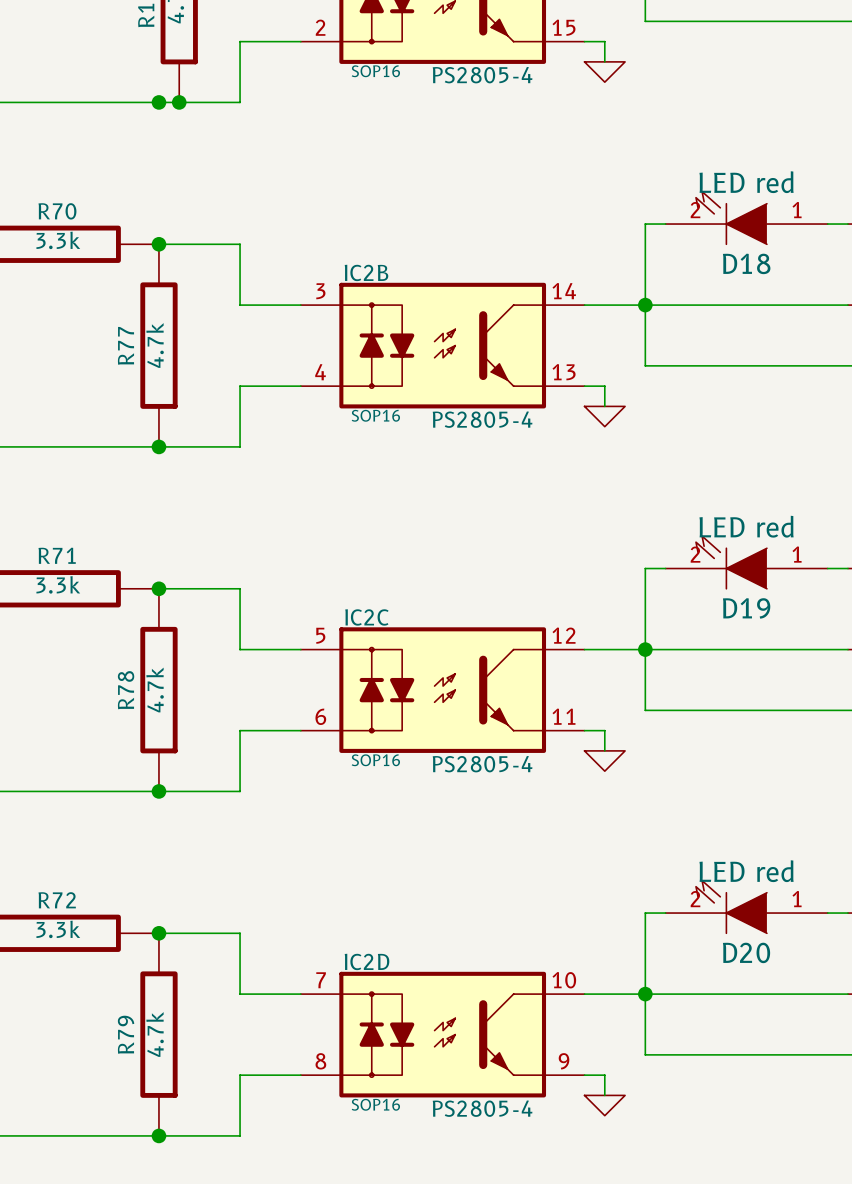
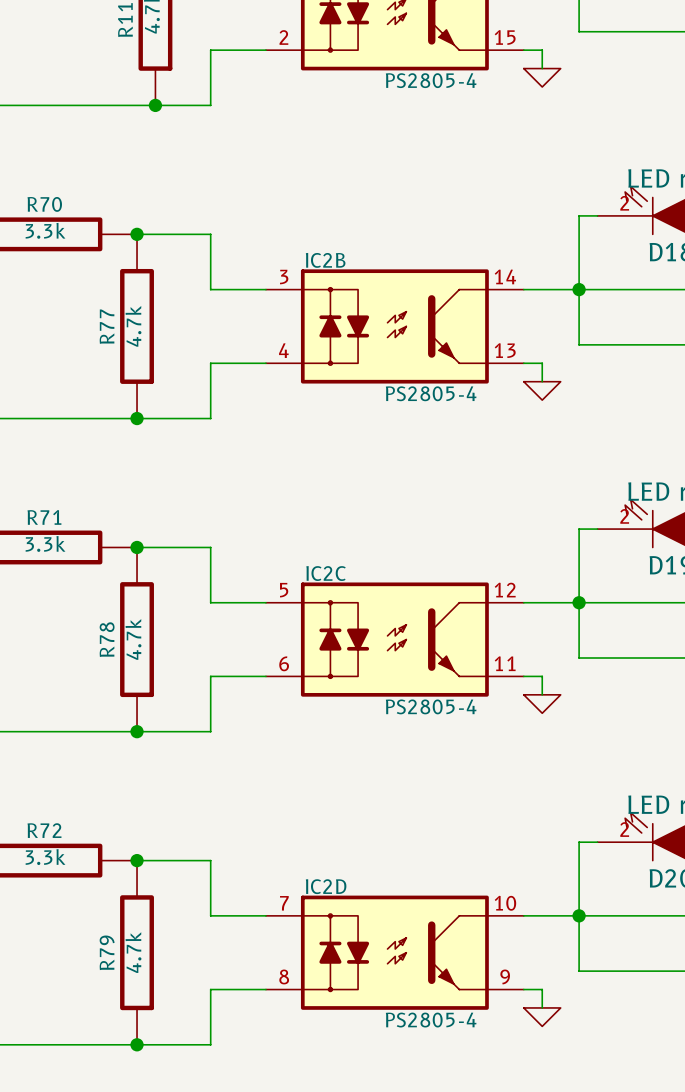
part text: SOP16 (375, 71) -> none
junction: (158, 102) -> none
IC2B text: SOP16 (375, 415) -> none
IC2C text: SOP16 (375, 760) -> none
IC2D text: SOP16 (375, 1104) -> none

